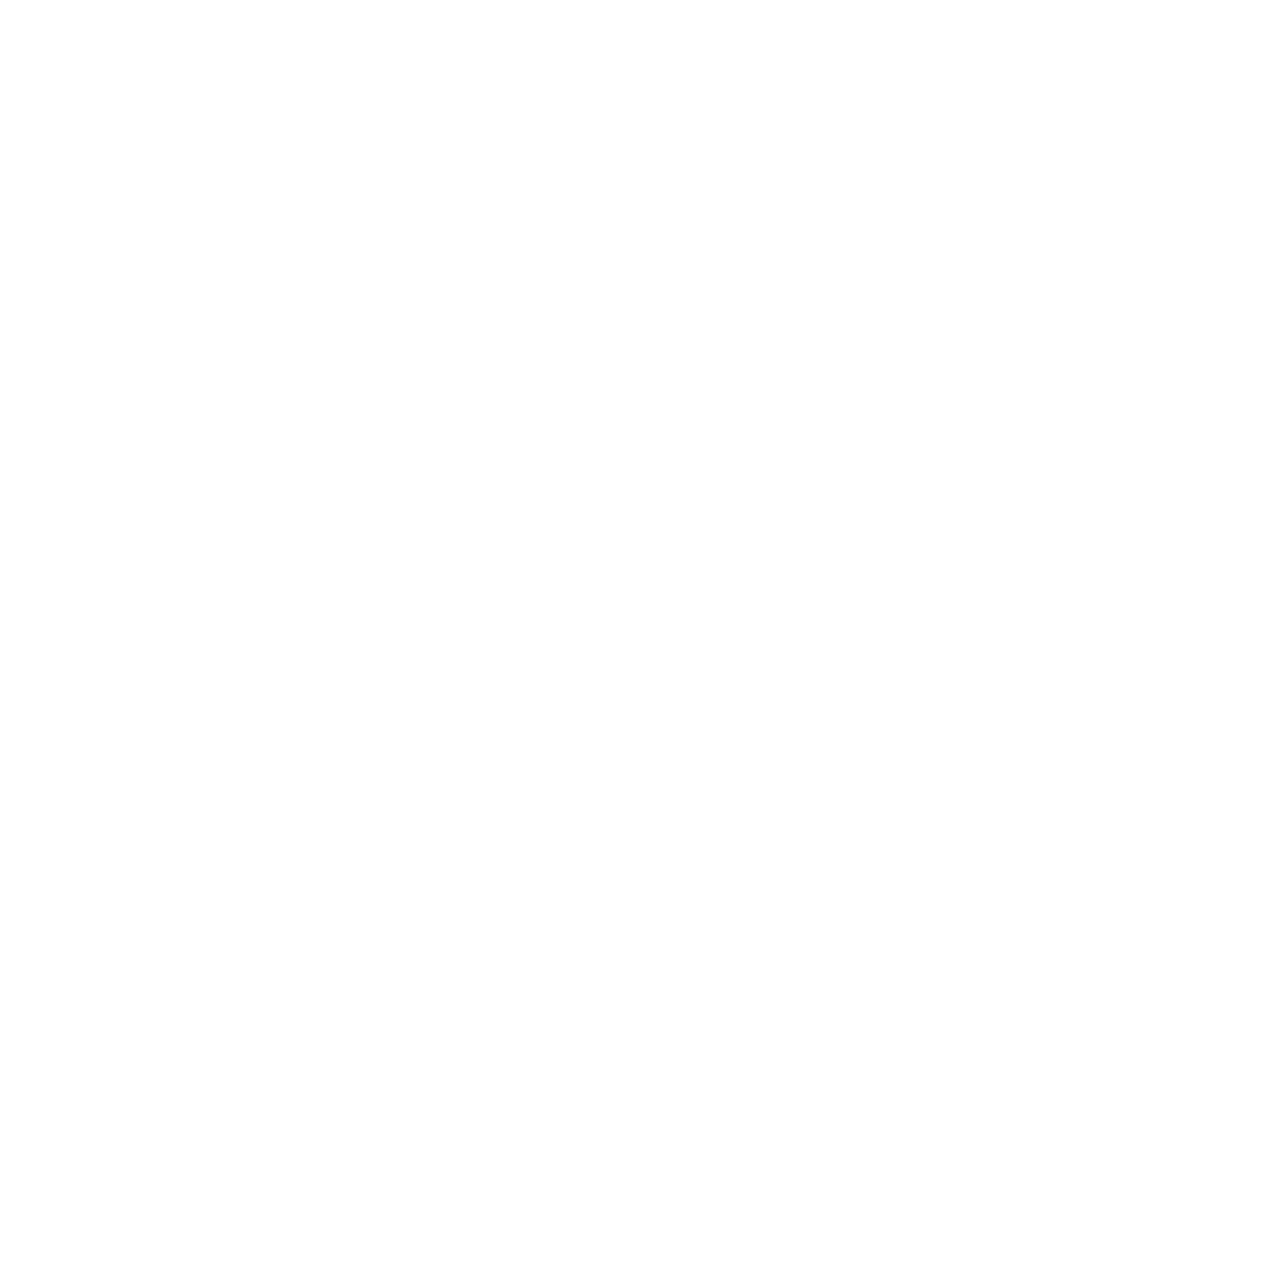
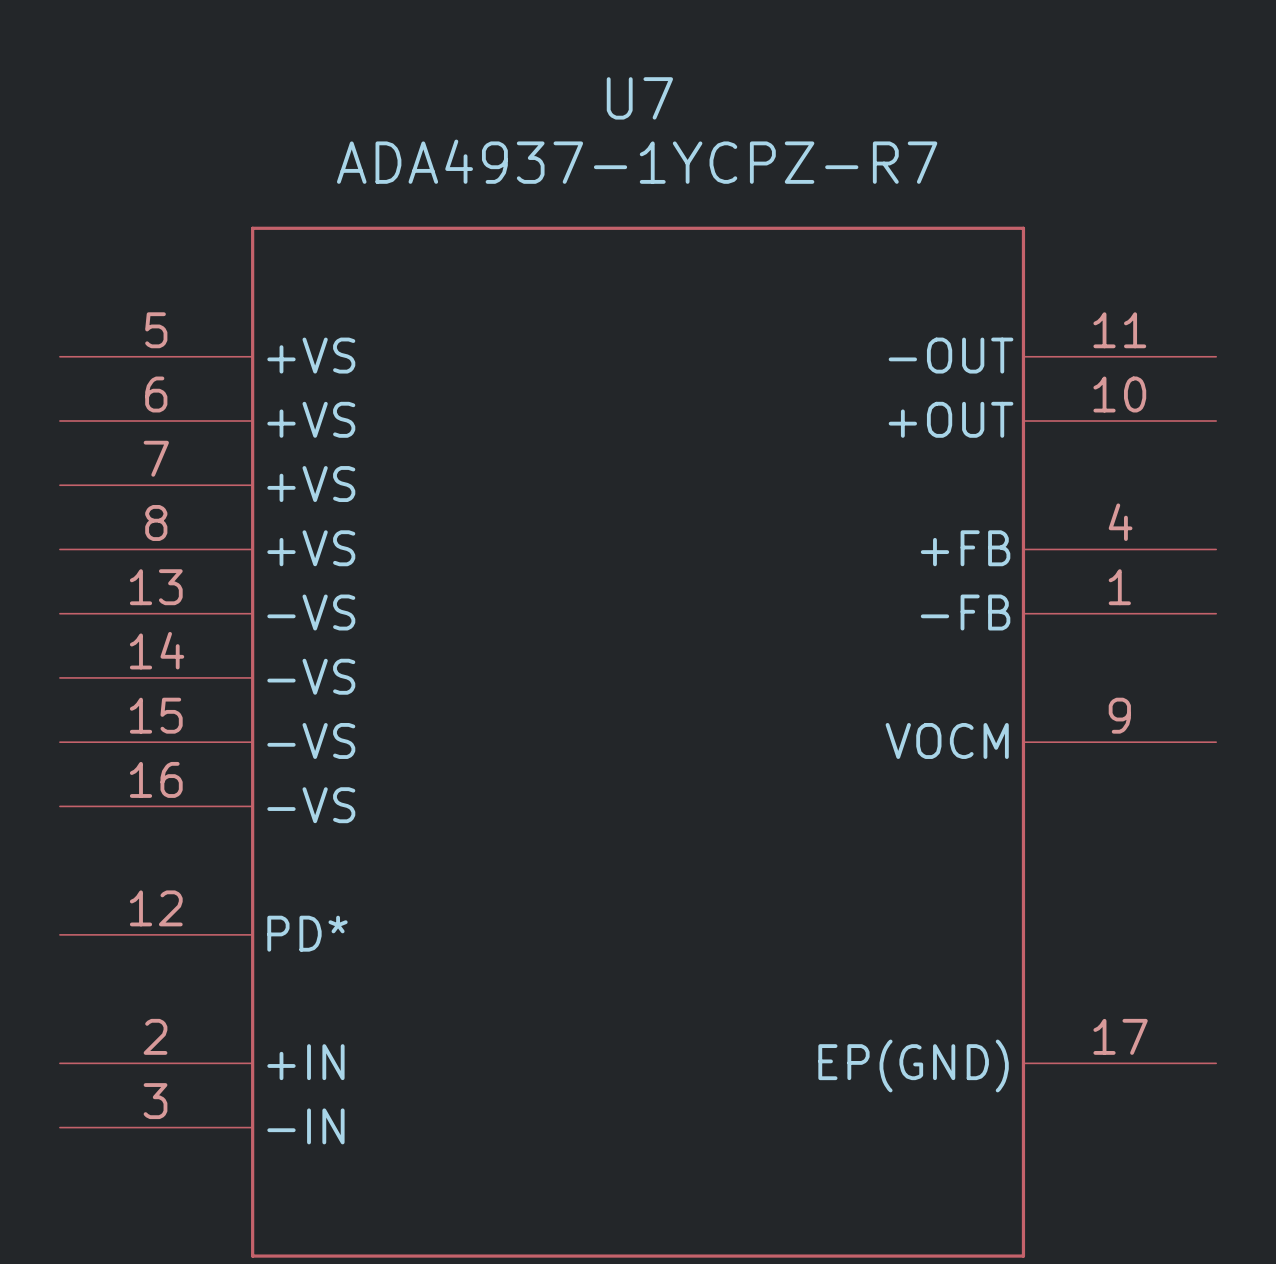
U7: none -> ADA4937-1YCPZ-R7 (638, 742)

